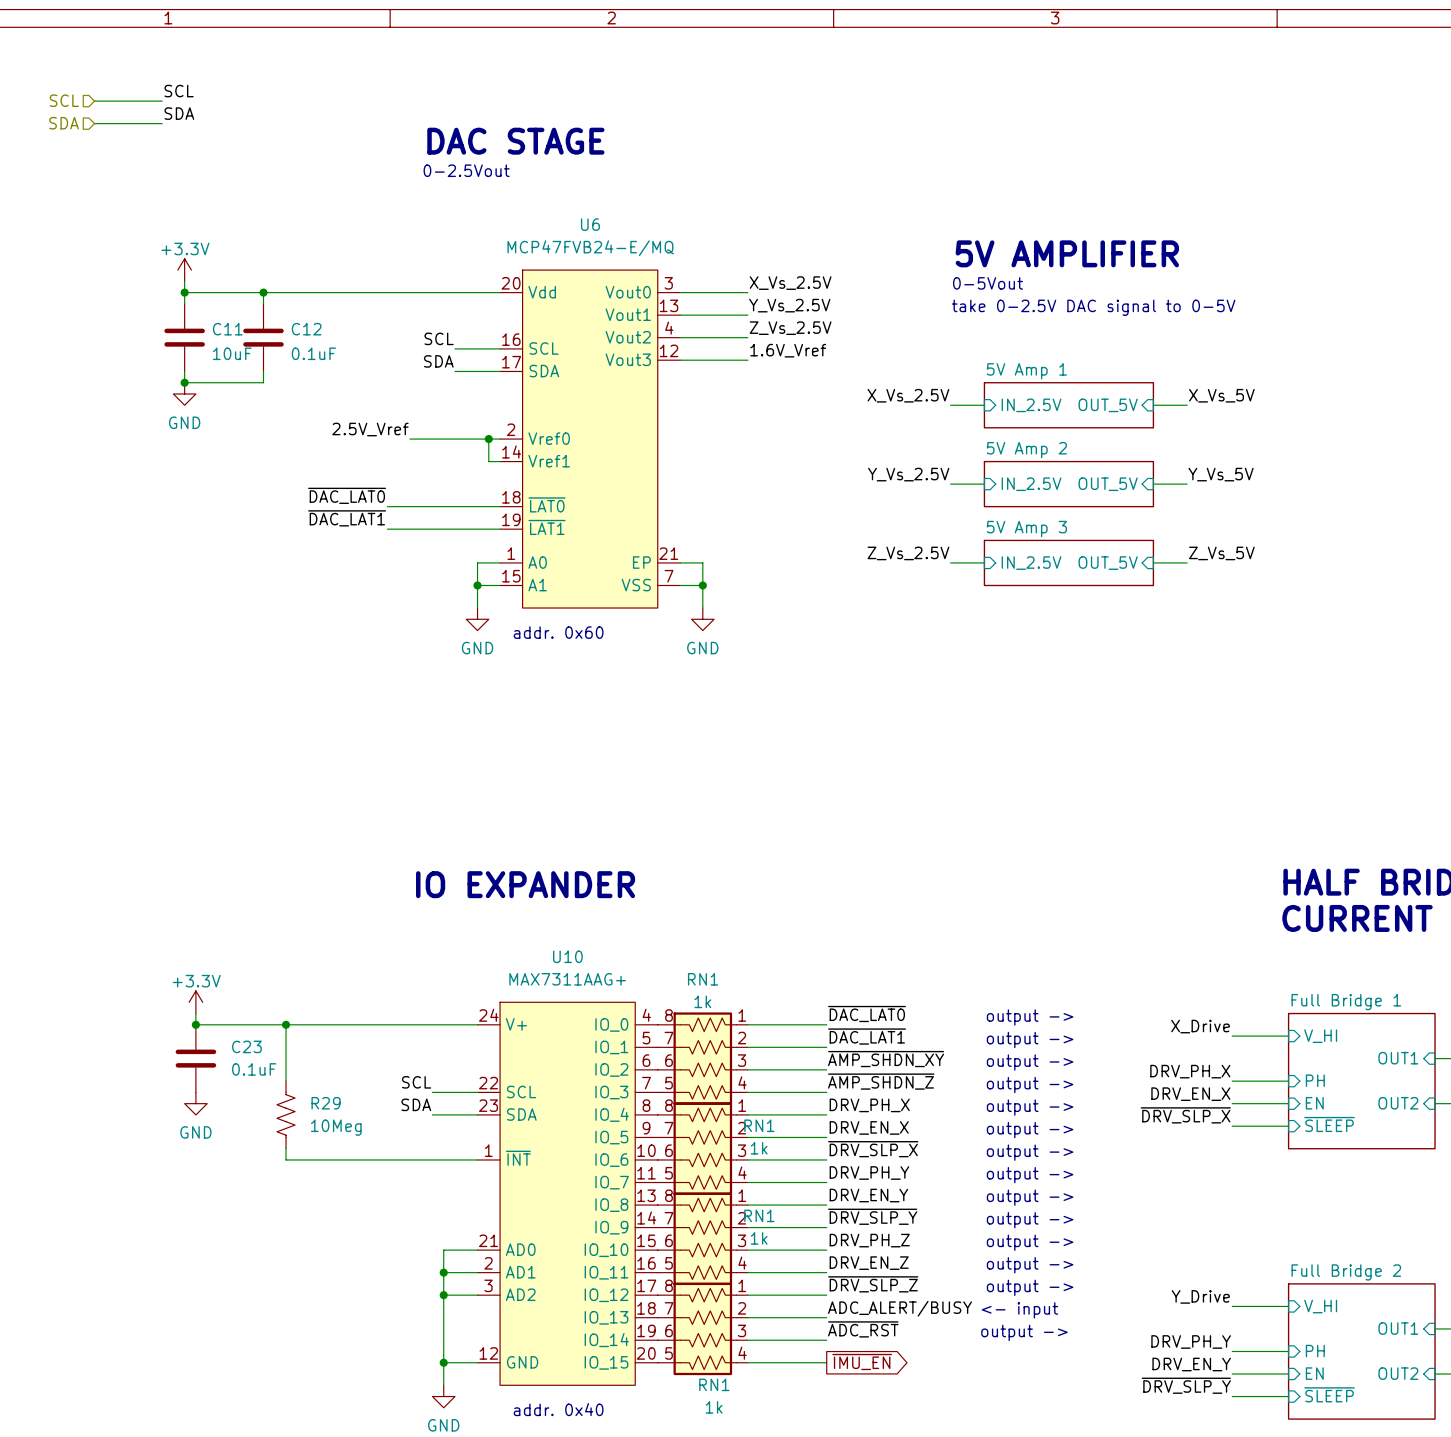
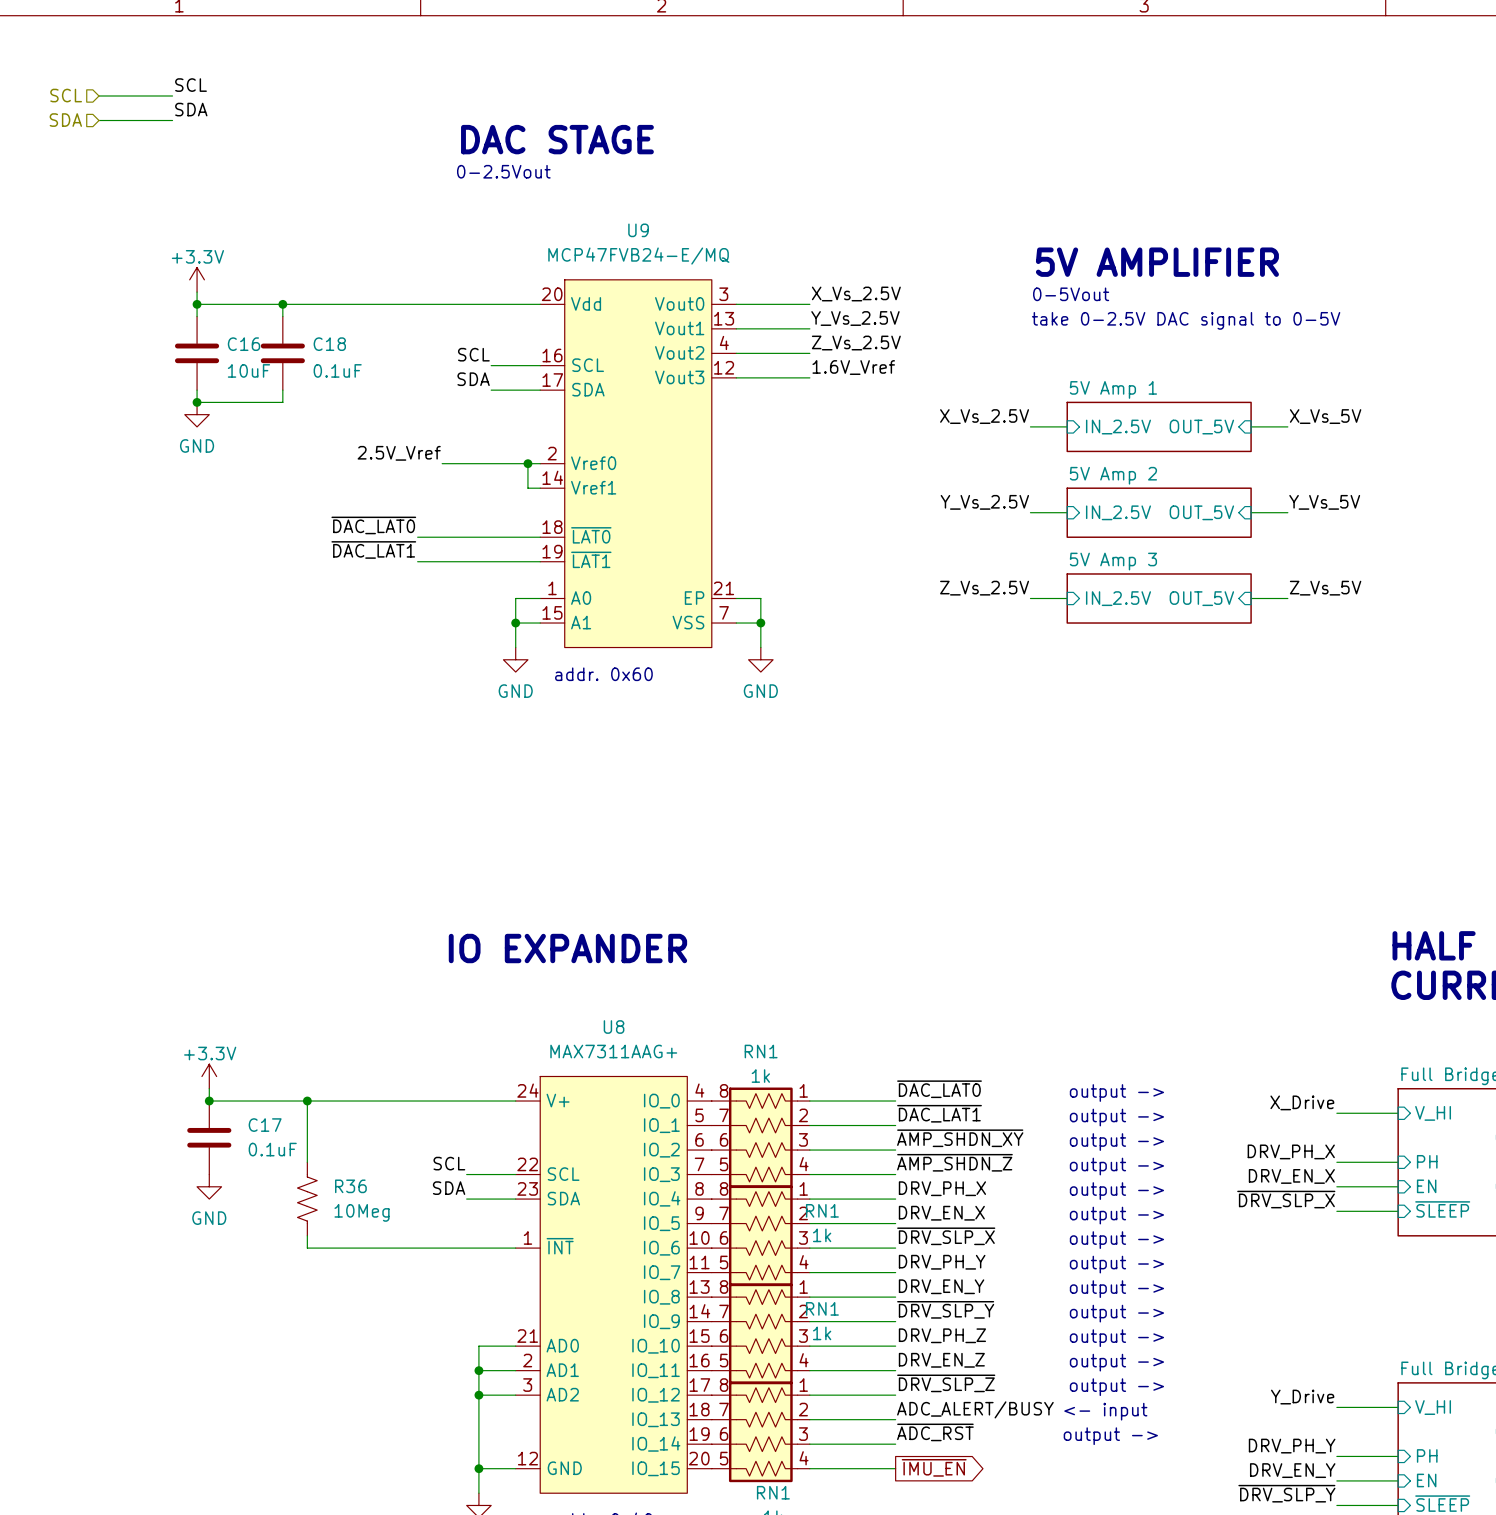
U6 name: U6 (590, 224) -> U9 (638, 230)
C11 name: C11 (227, 329) -> C16 (244, 344)
C12 name: C12 (306, 329) -> C18 (329, 344)
U10 name: U10 (567, 956) -> U8 (614, 1027)
C23 name: C23 (246, 1046) -> C17 (265, 1125)
R29 name: R29 (326, 1103) -> R36 (350, 1186)

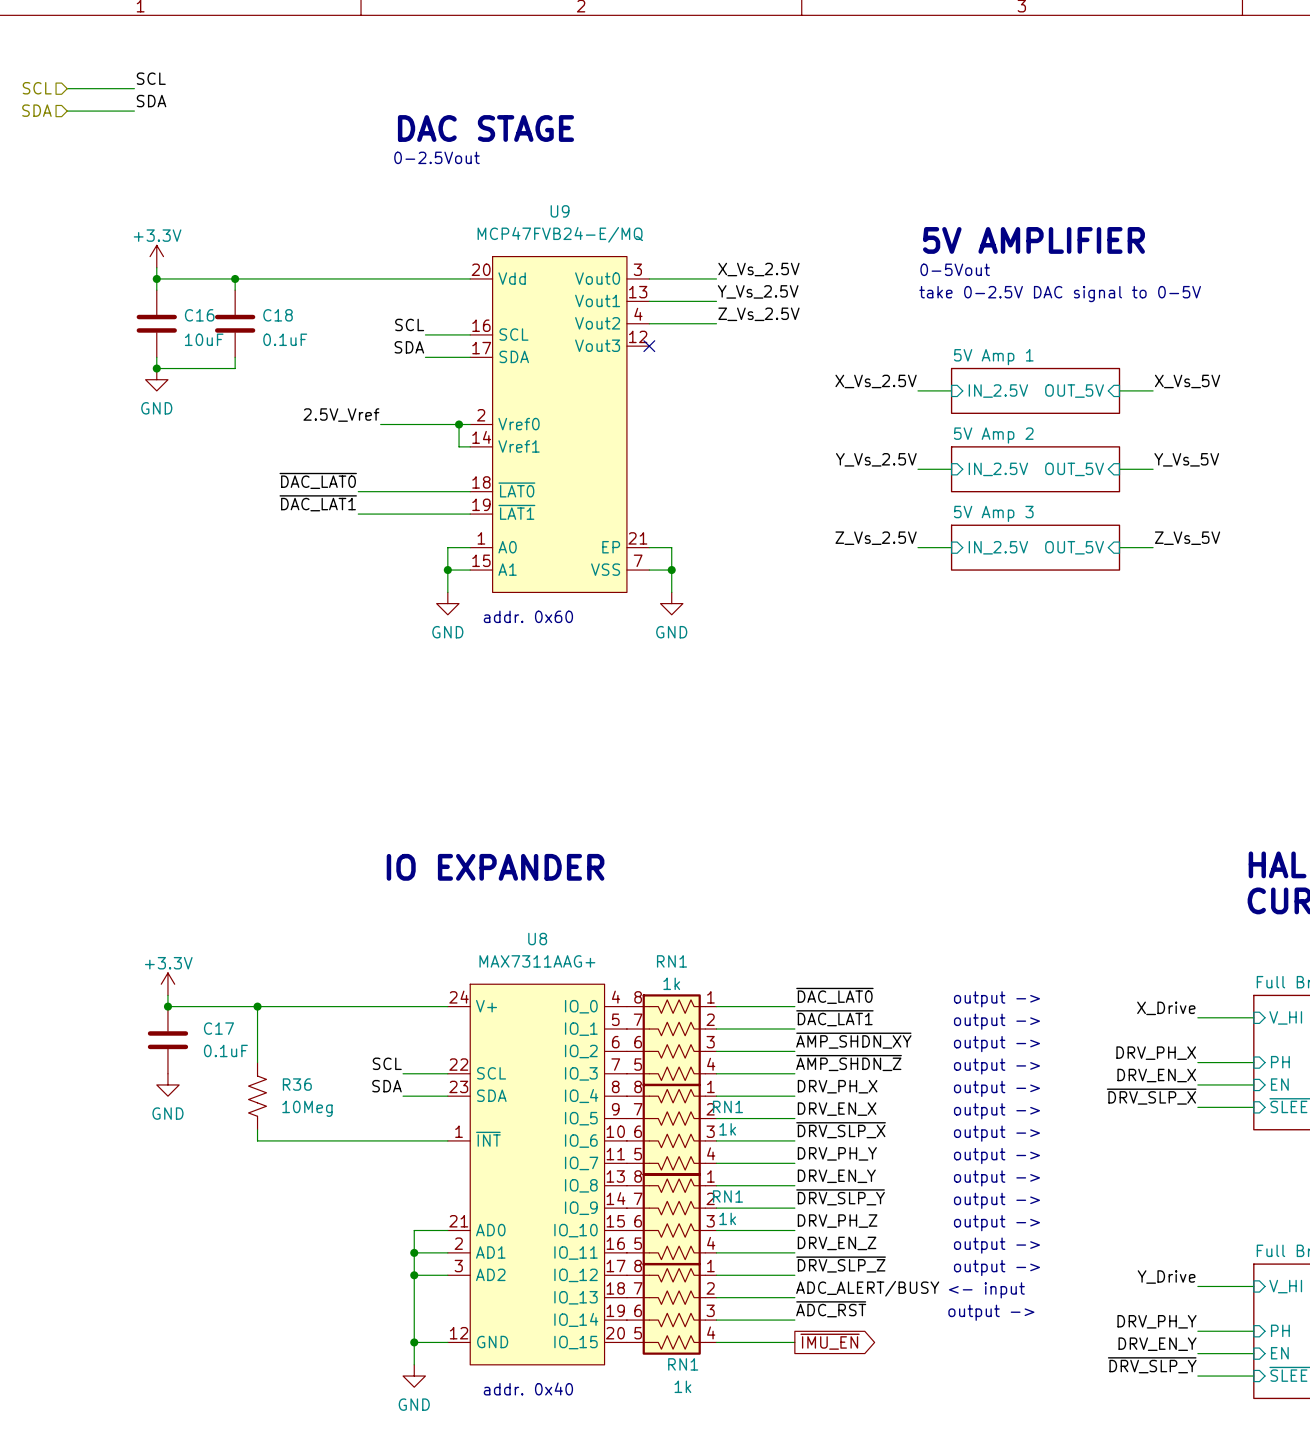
label: 1.6V_Vref (853, 367) -> none
wire: (736, 377) (809, 377) -> none
no-connect mark: none -> (649, 346)

